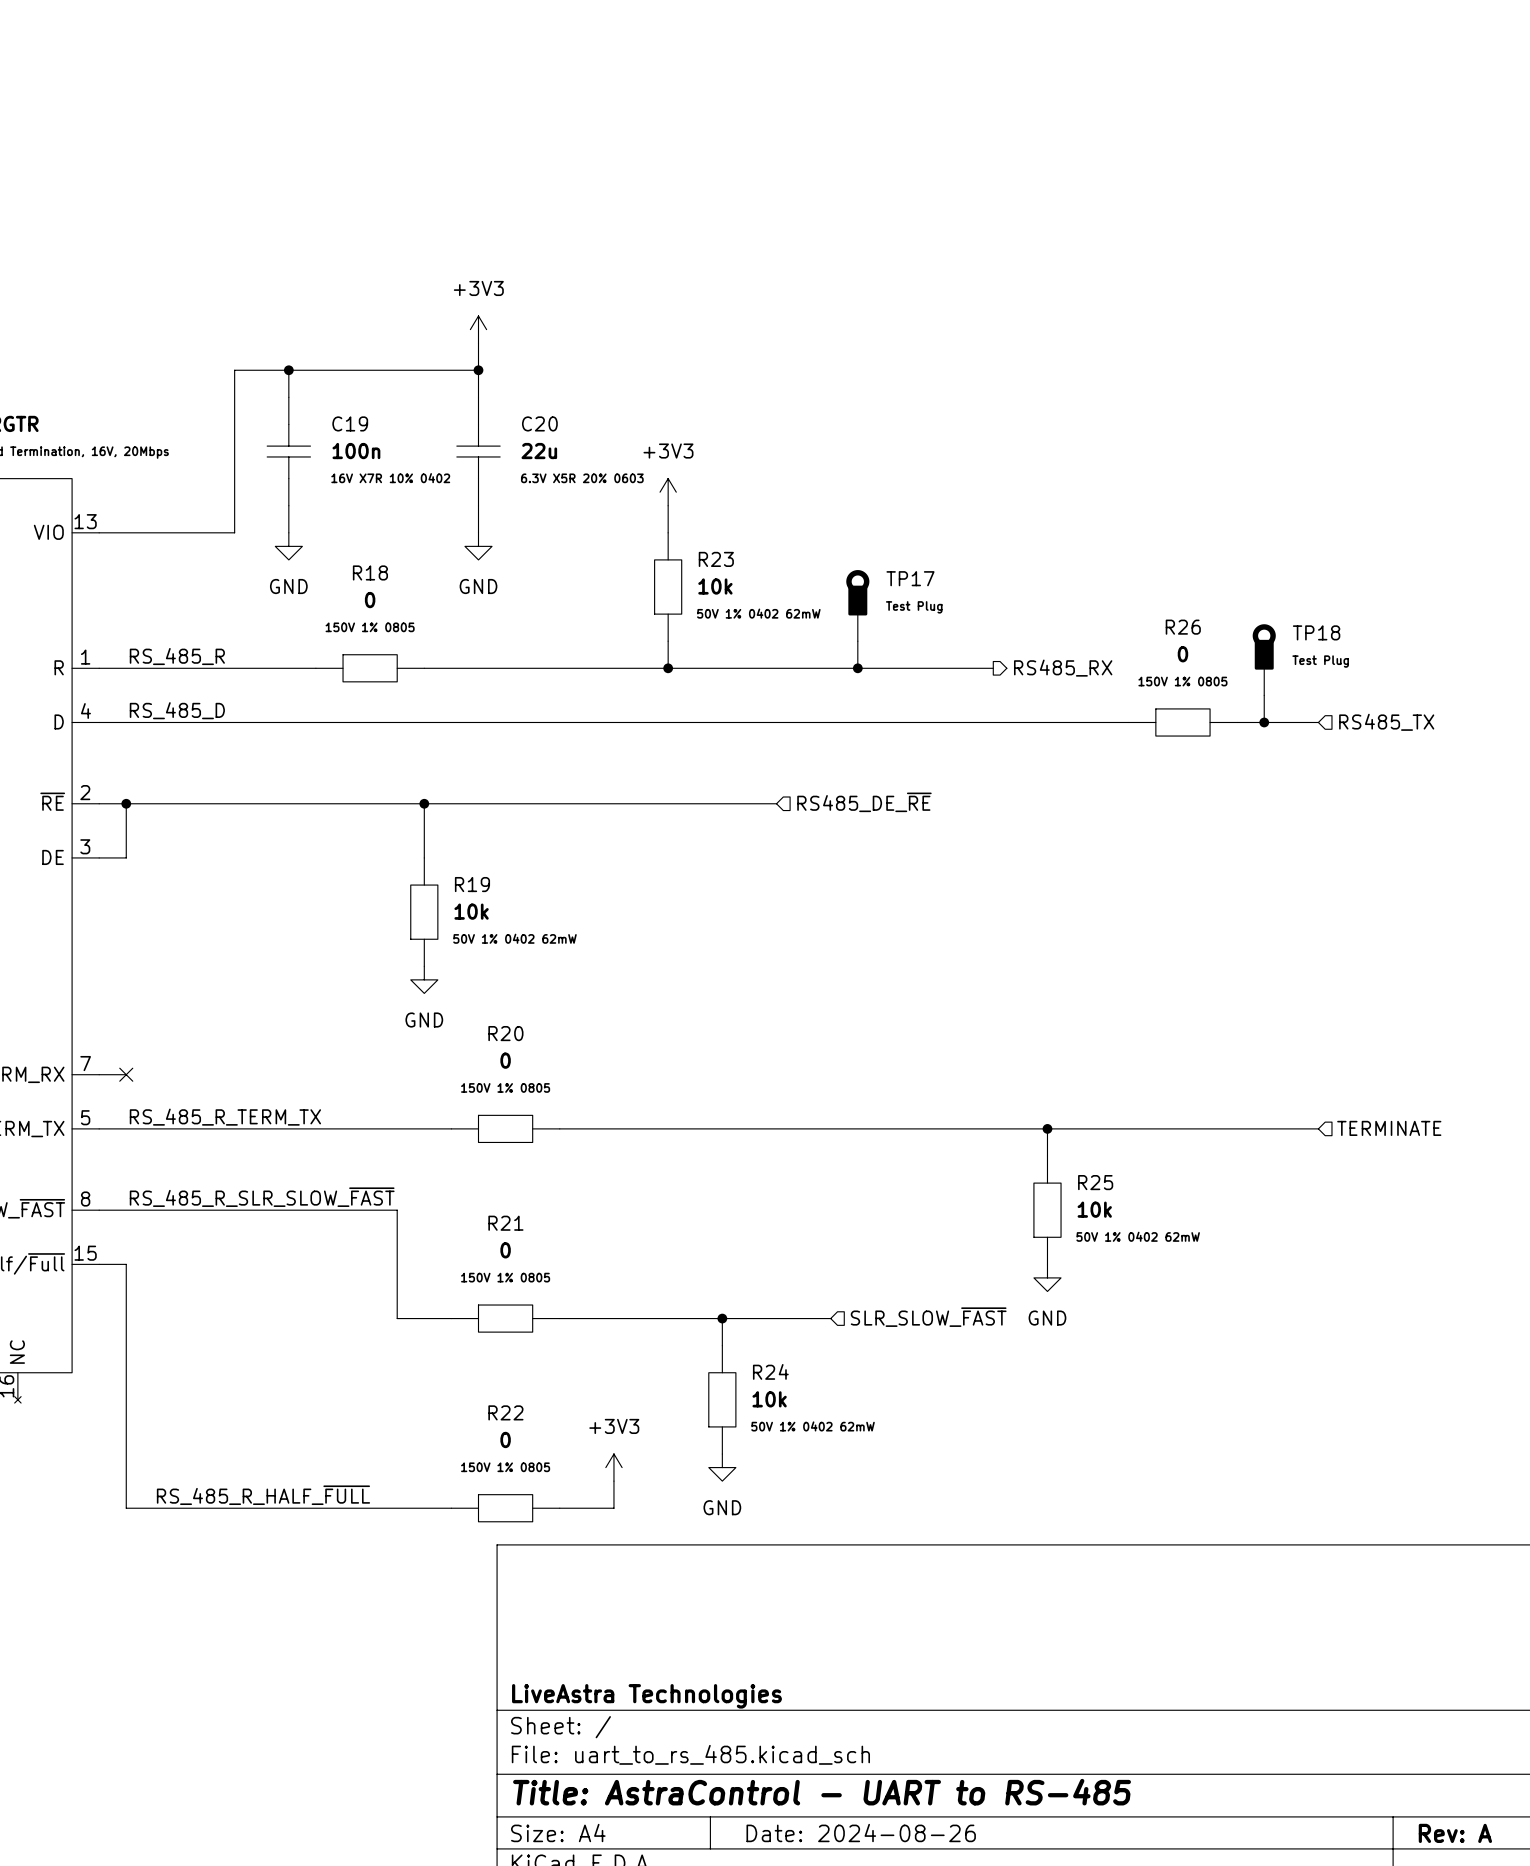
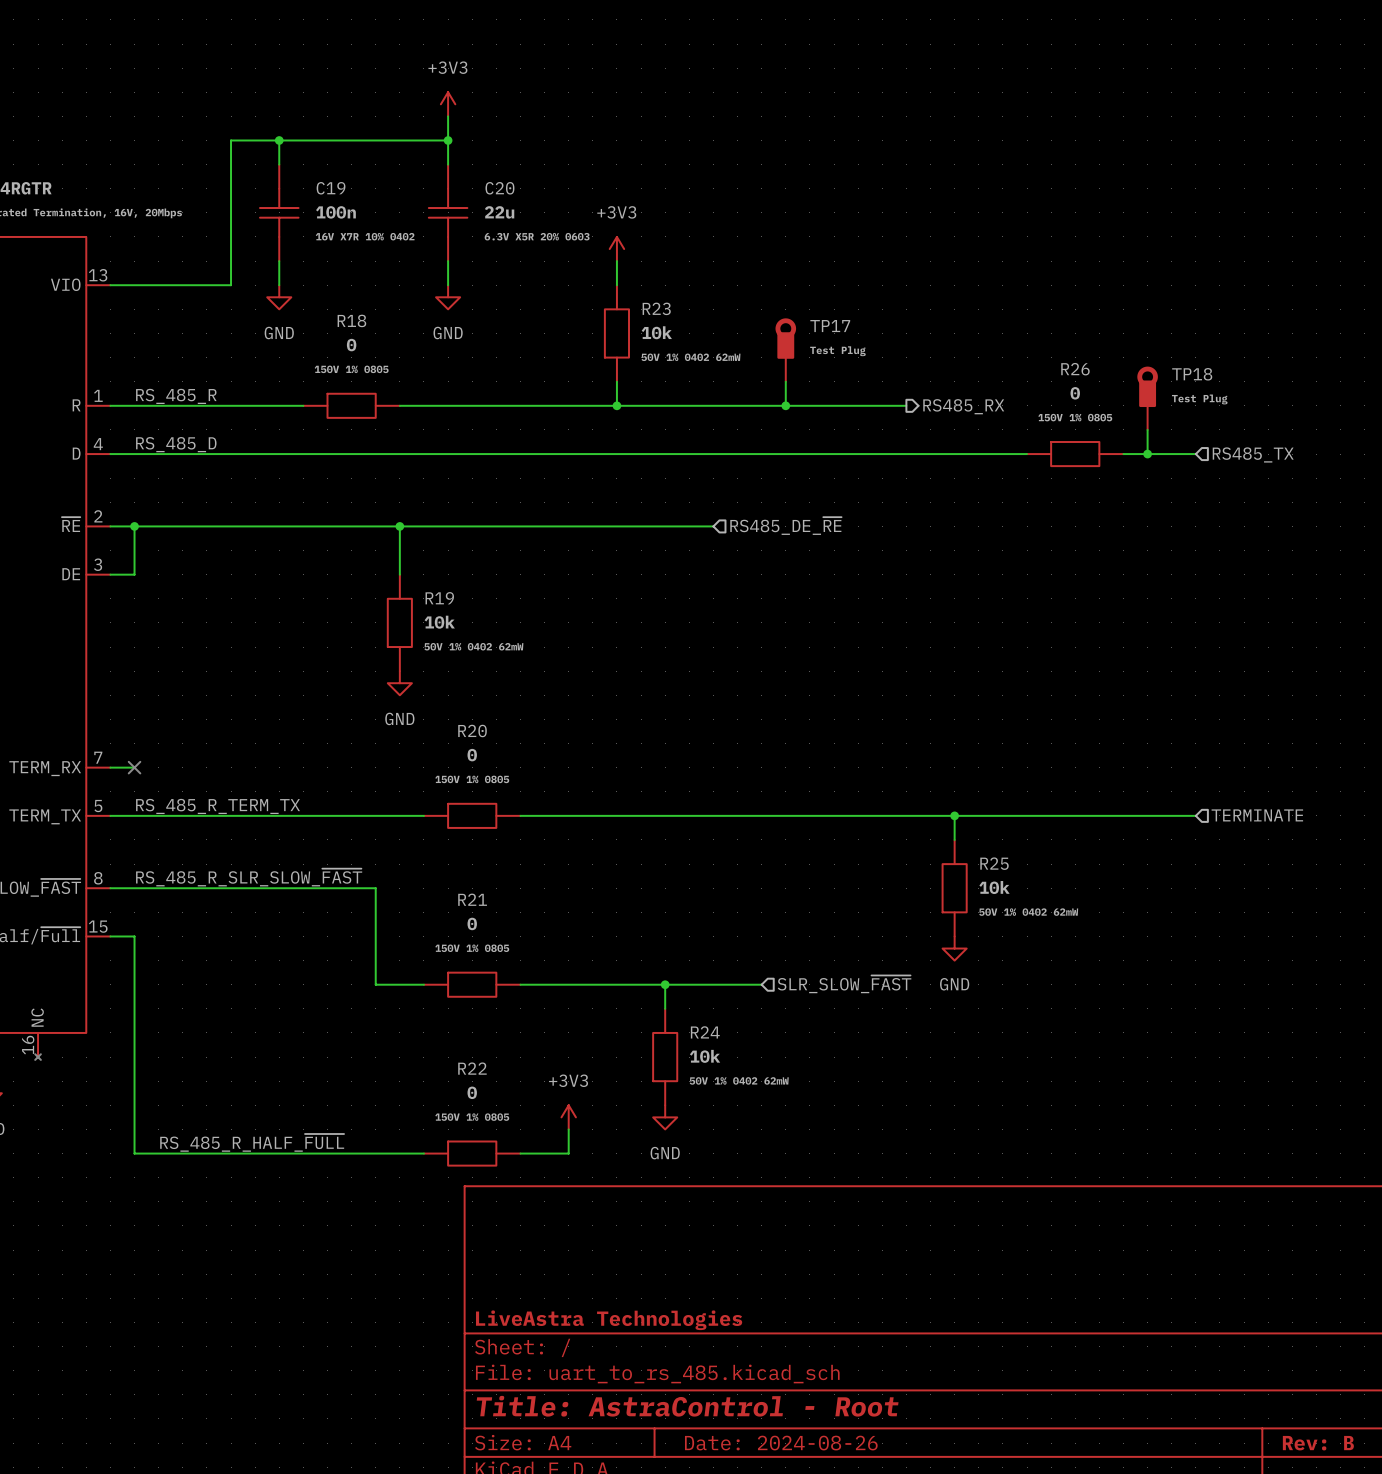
title block: Title: AstraControl - UART to RS-485 (822, 1792) -> Title: AstraControl - Root (687, 1406)
title block: Rev: A (1455, 1833) -> Rev: B (1318, 1443)

